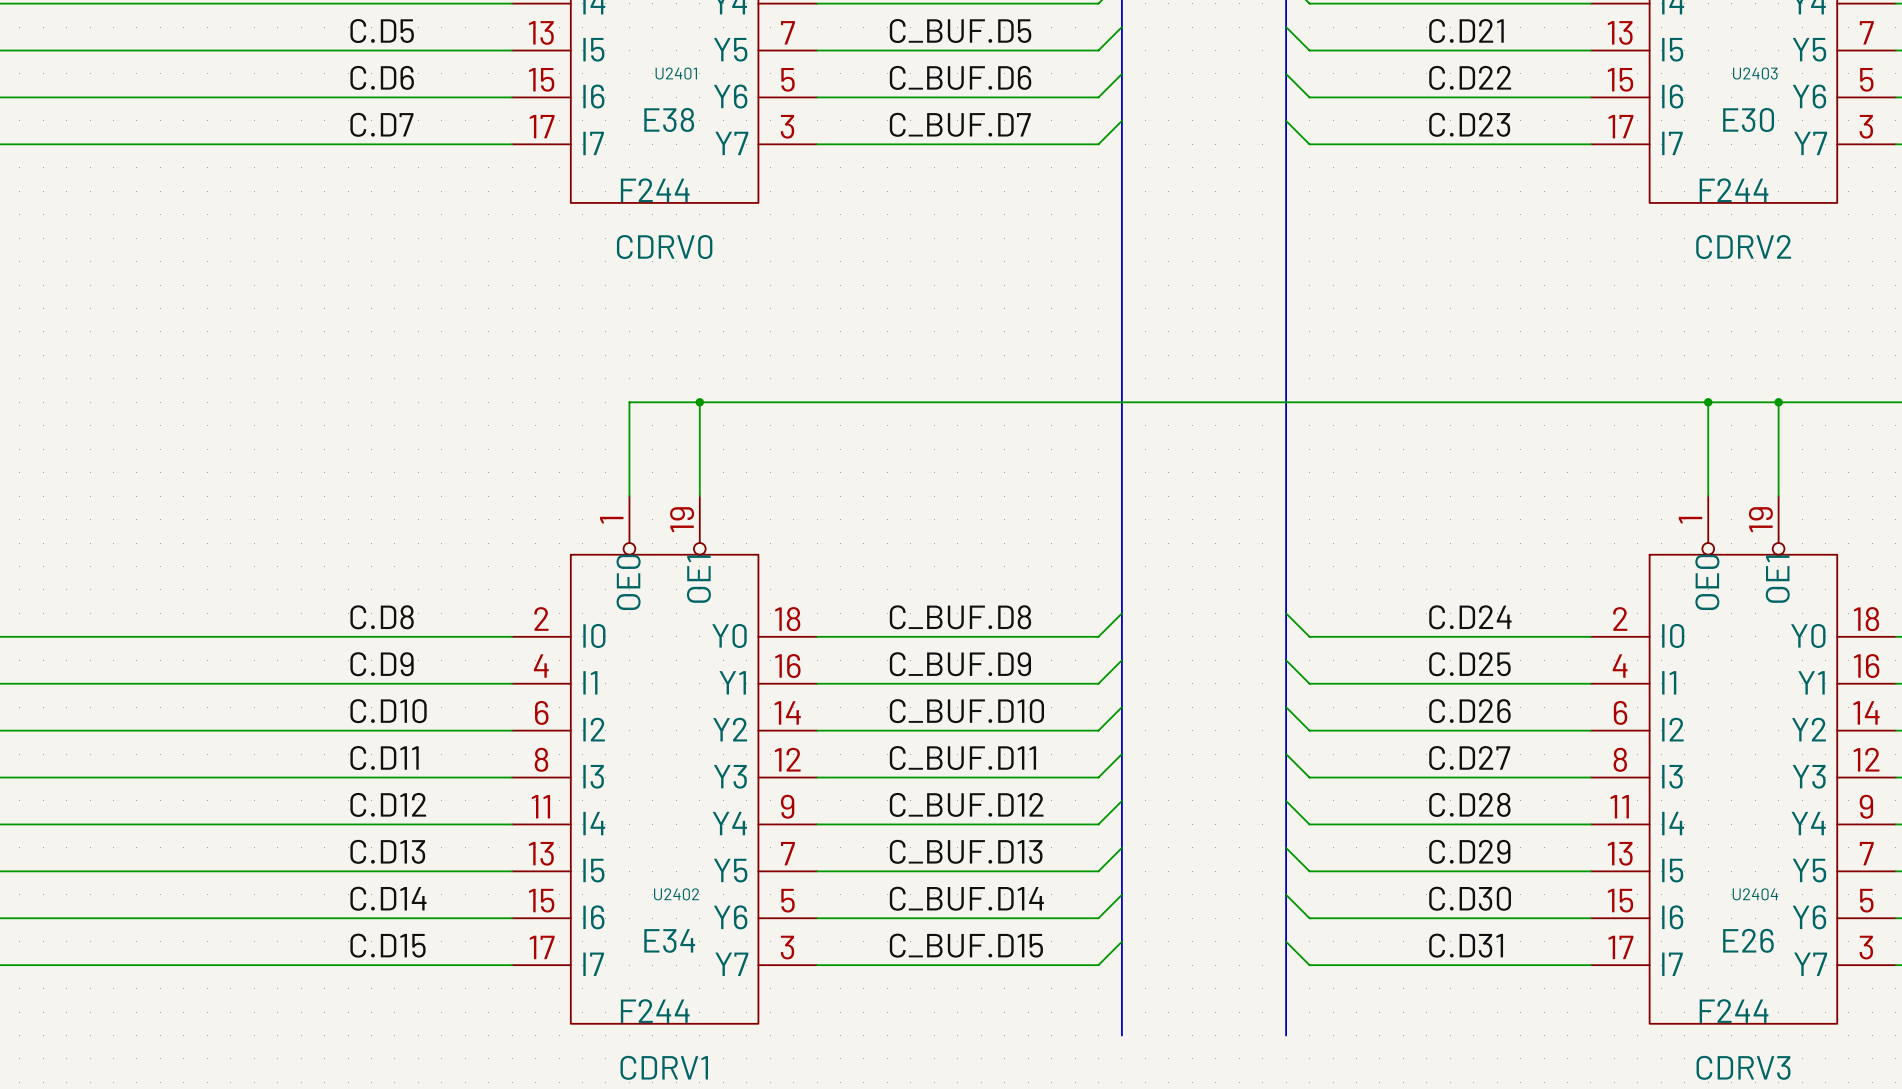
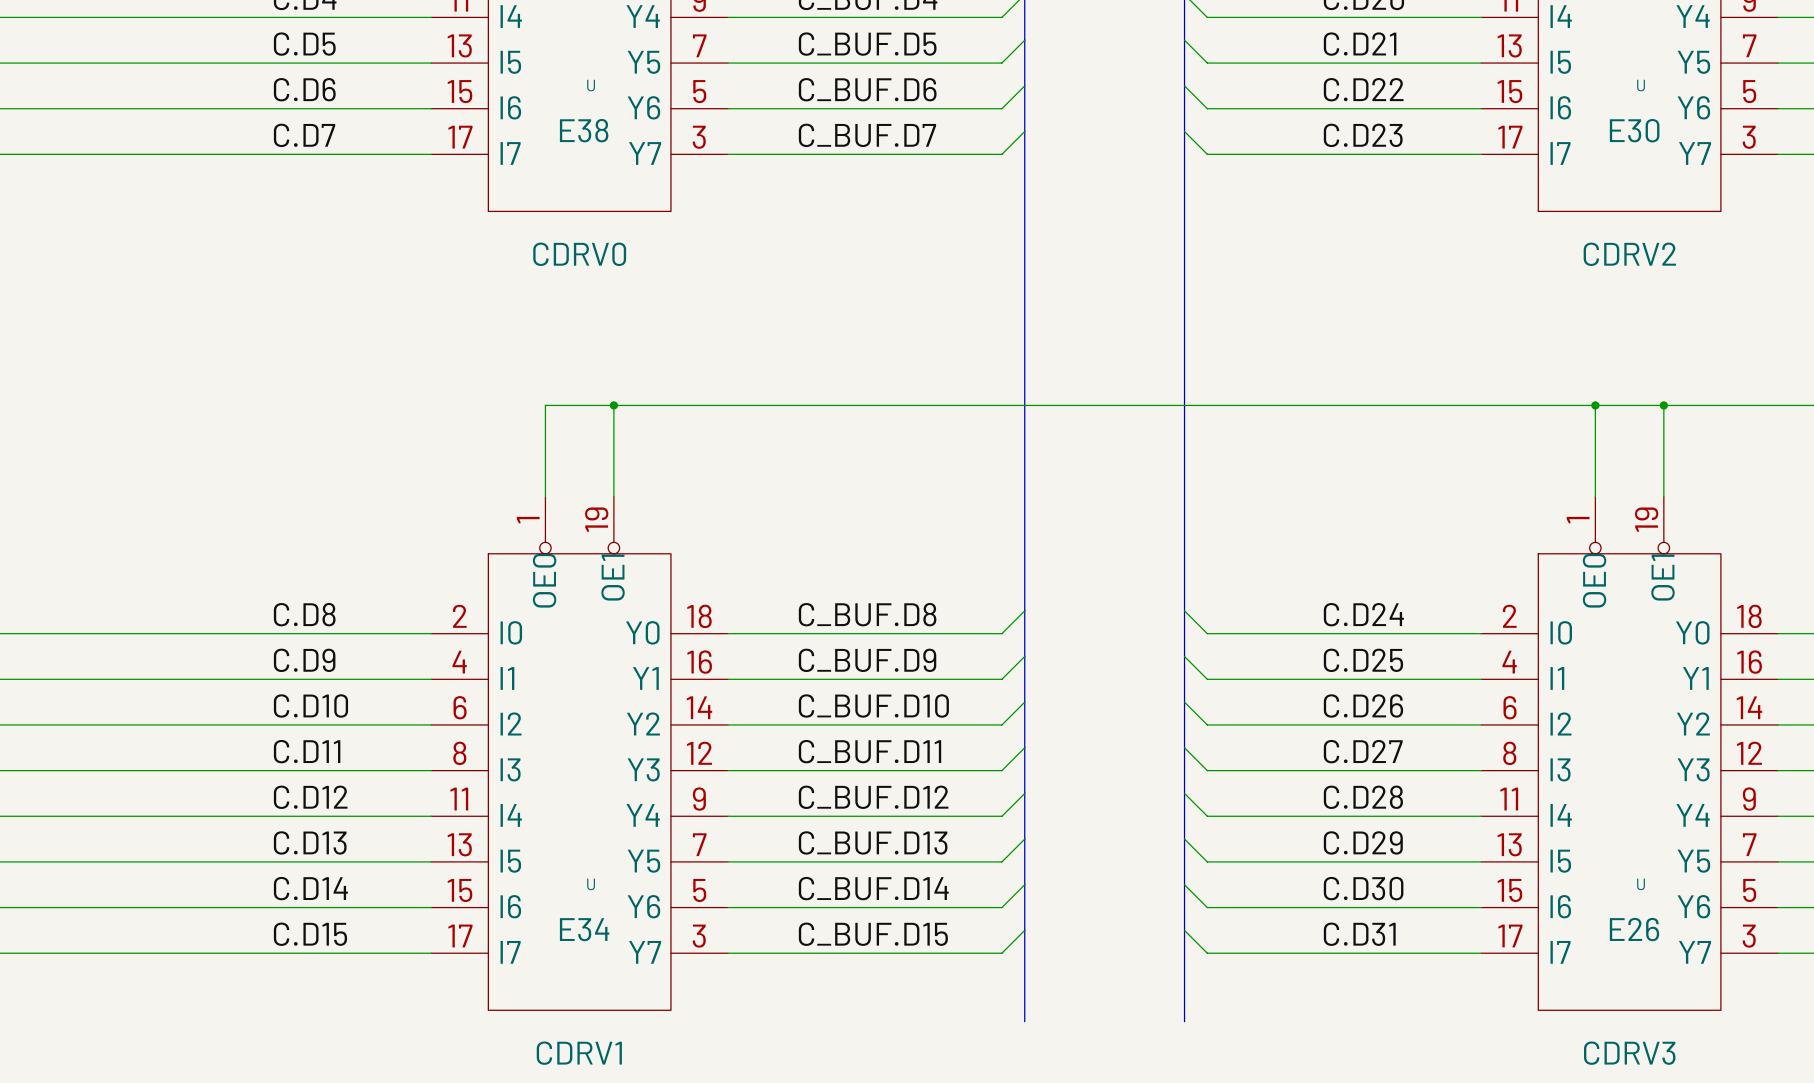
U2401 name: U2401 (676, 73) -> U (591, 85)
U2403 name: U2403 (1755, 73) -> U (1641, 85)
U2401 value: F244 (655, 190) -> none
U2403 value: F244 (1734, 190) -> none
U2402 name: U2402 (676, 894) -> U (591, 884)
U2404 name: U2404 (1755, 894) -> U (1641, 884)
U2402 value: F244 (655, 1011) -> none
U2404 value: F244 (1734, 1011) -> none

